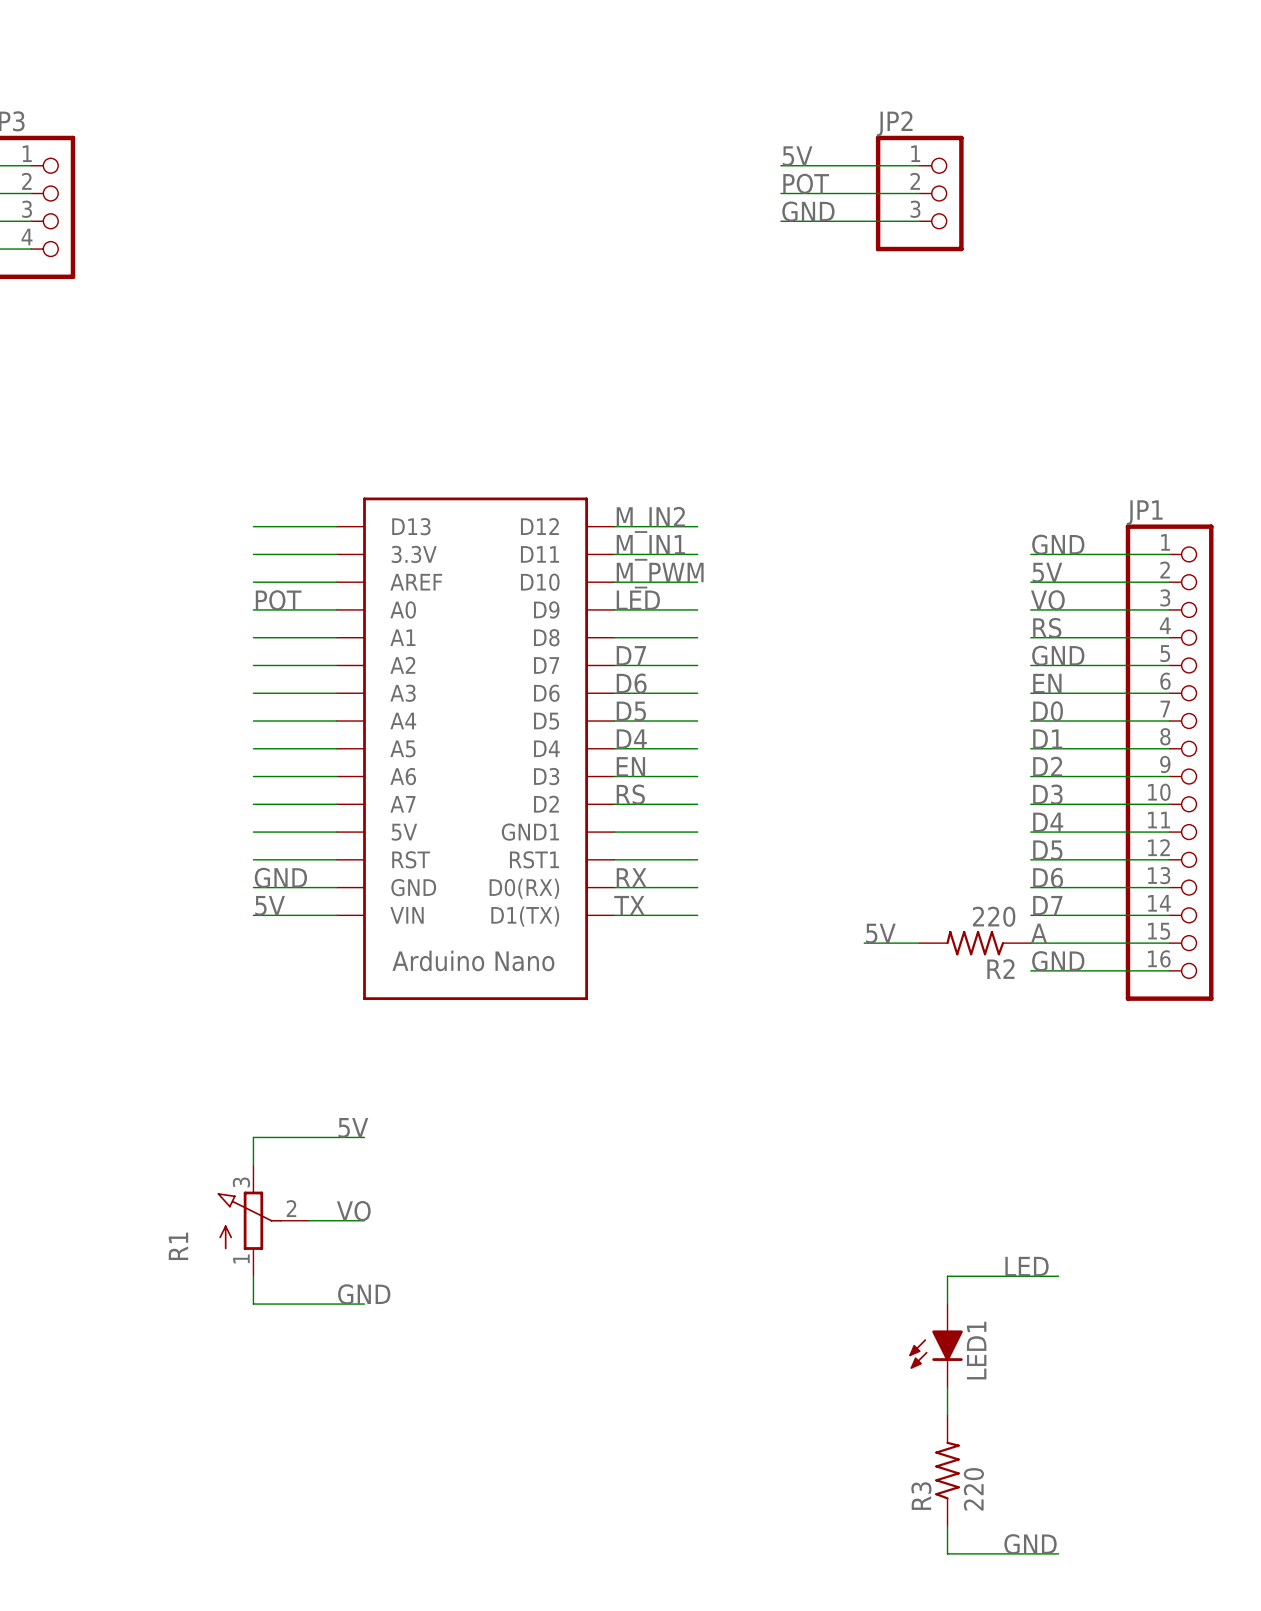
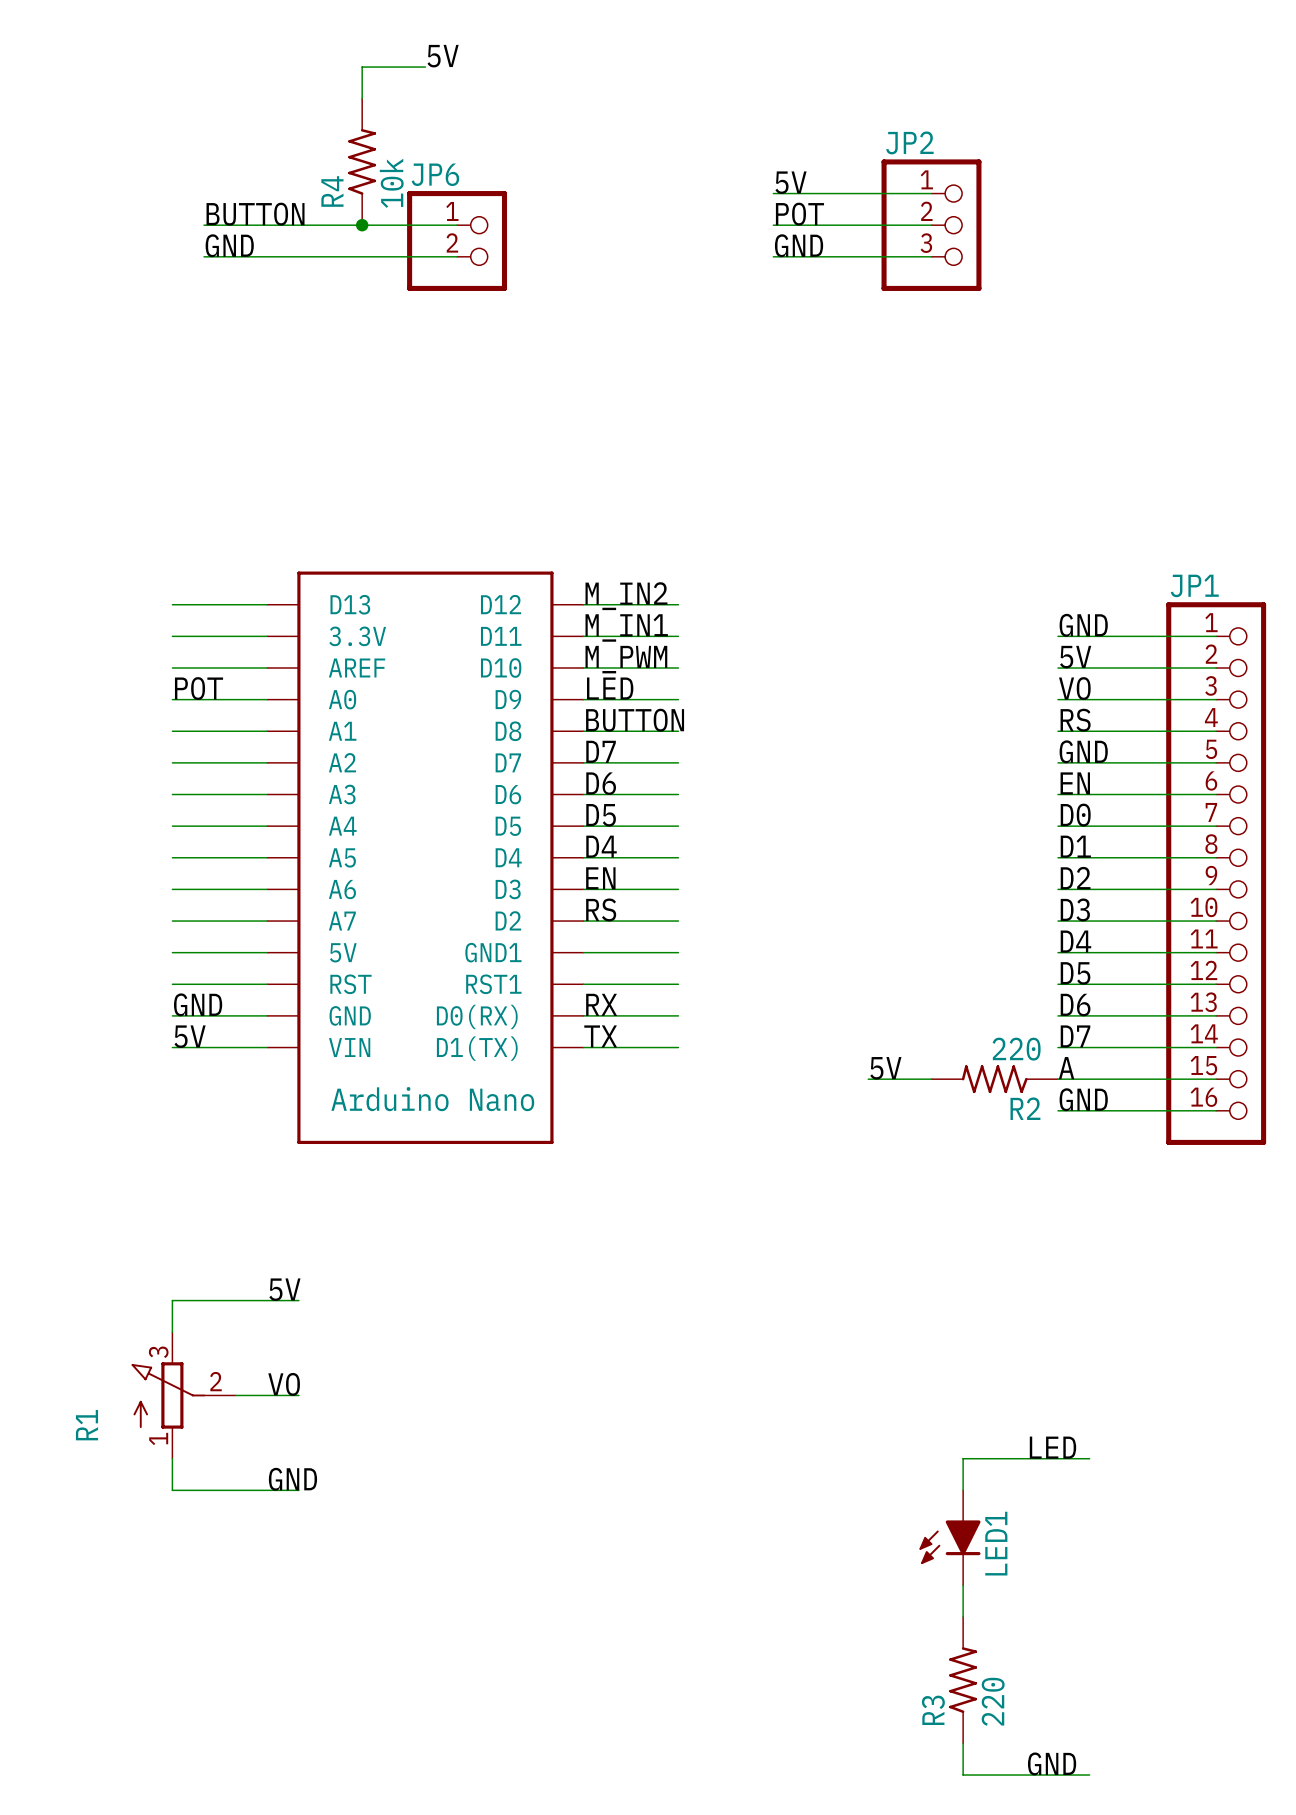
label: none -> 5V (443, 56)
wire: none -> (425, 67) (362, 67) (362, 98)
R4: none -> 10k (362, 161)
label: none -> BUTTON (255, 214)
wire: none -> (204, 225) (457, 225)
junction: none -> (362, 225)
JP6: none -> (457, 241)
label: none -> GND (229, 245)
wire: none -> (204, 256) (457, 256)
label: none -> BUTTON (635, 720)

